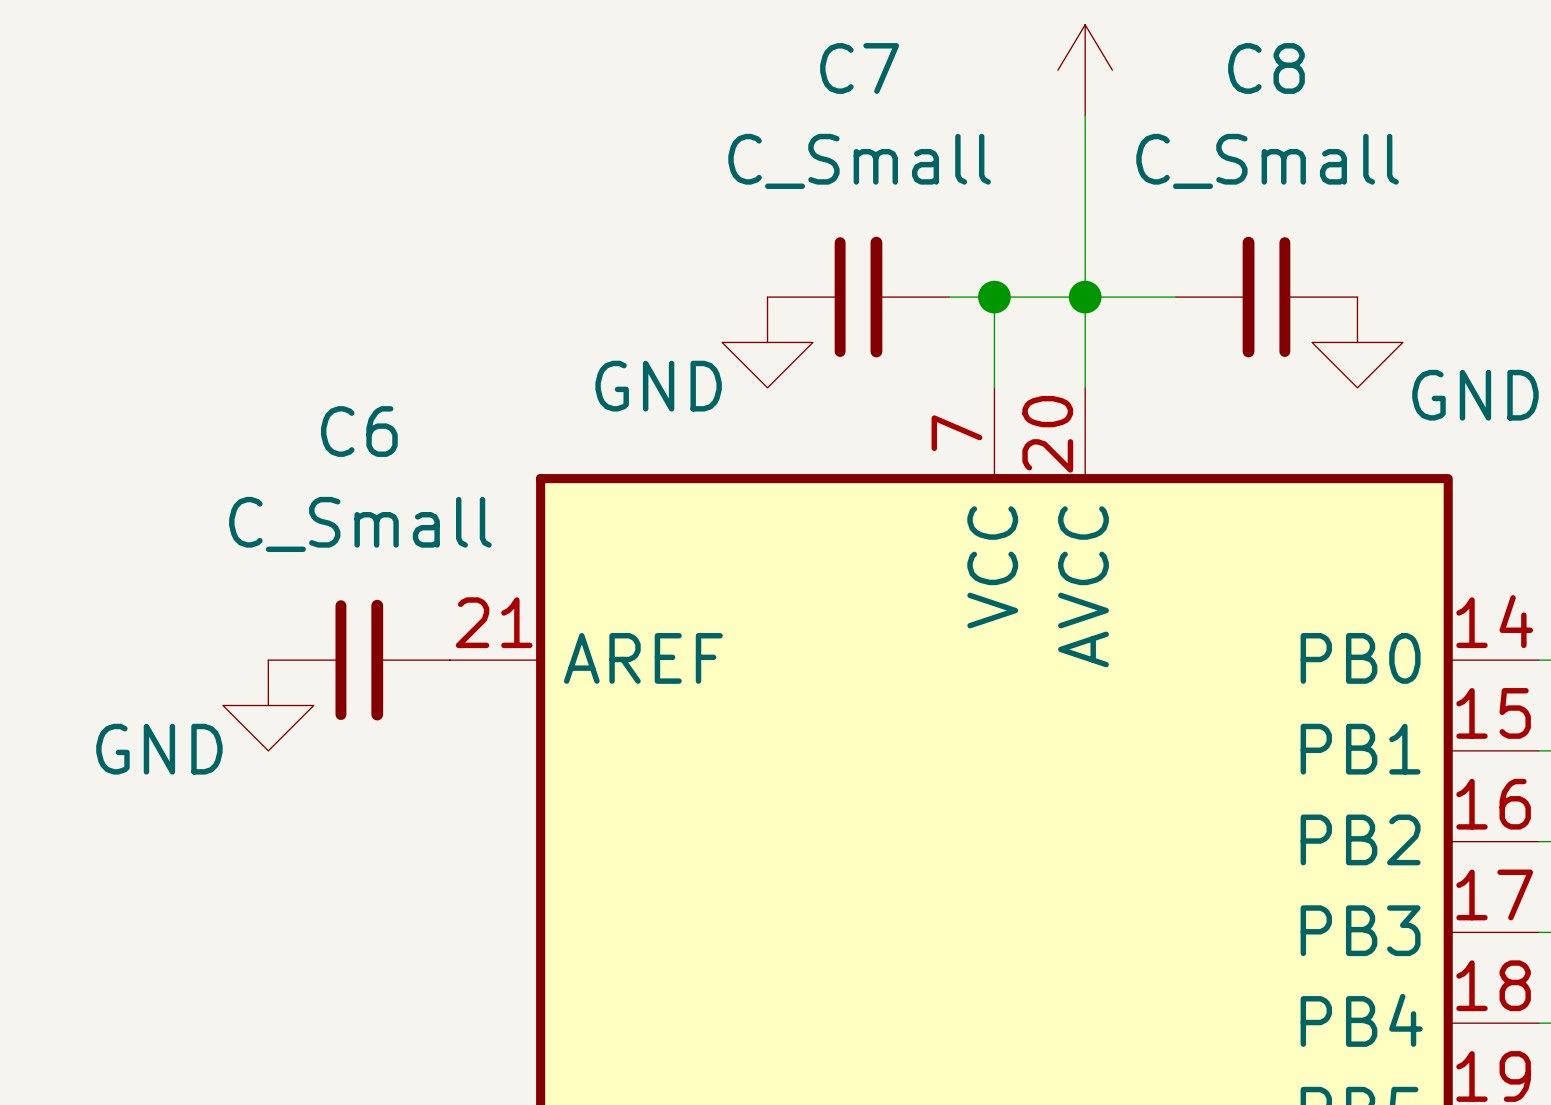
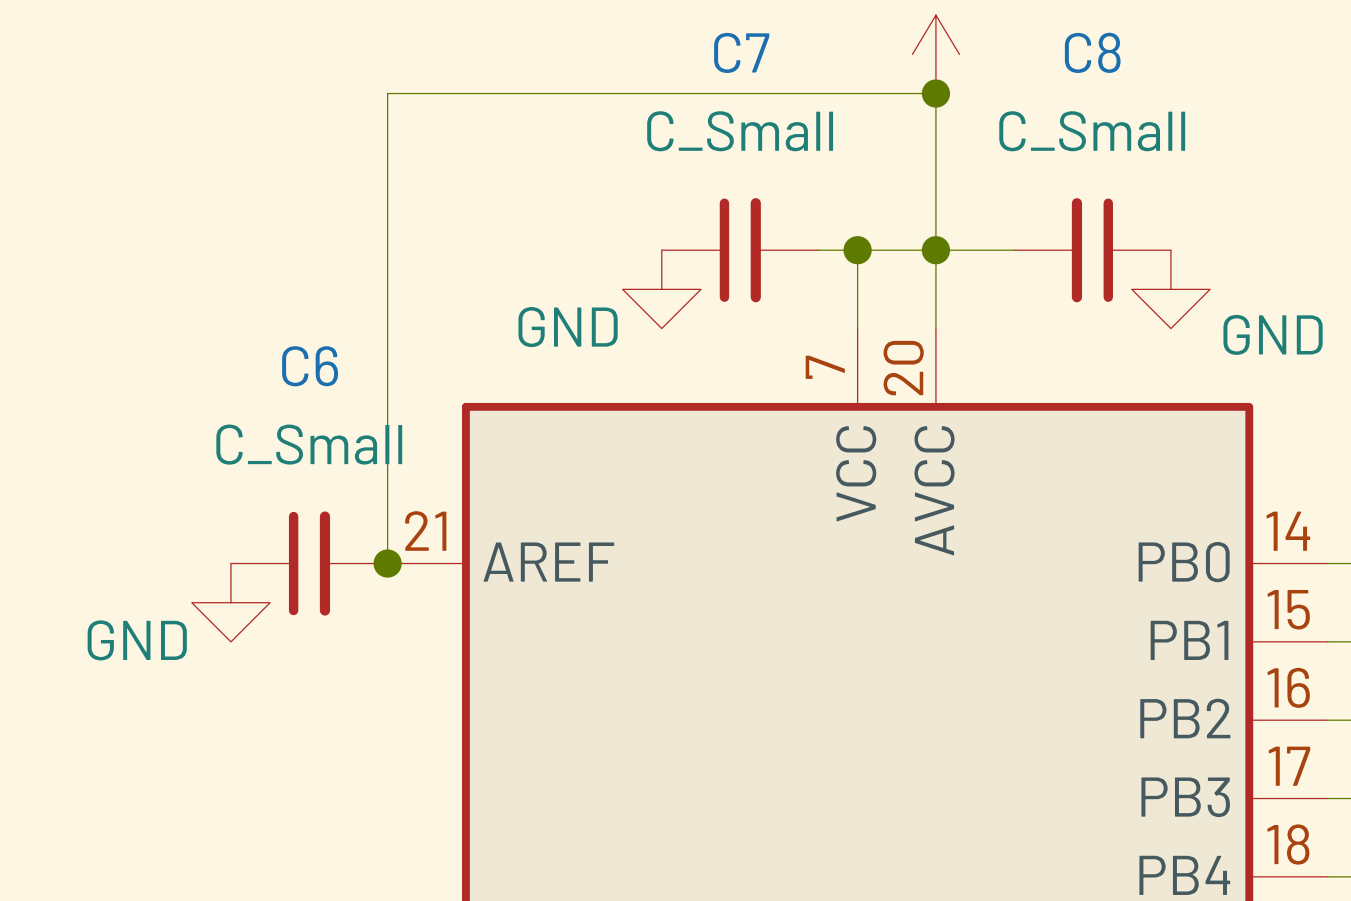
wire: none -> (935, 93) (387, 93) (387, 563)
junction: none -> (935, 93)
junction: none -> (387, 563)

